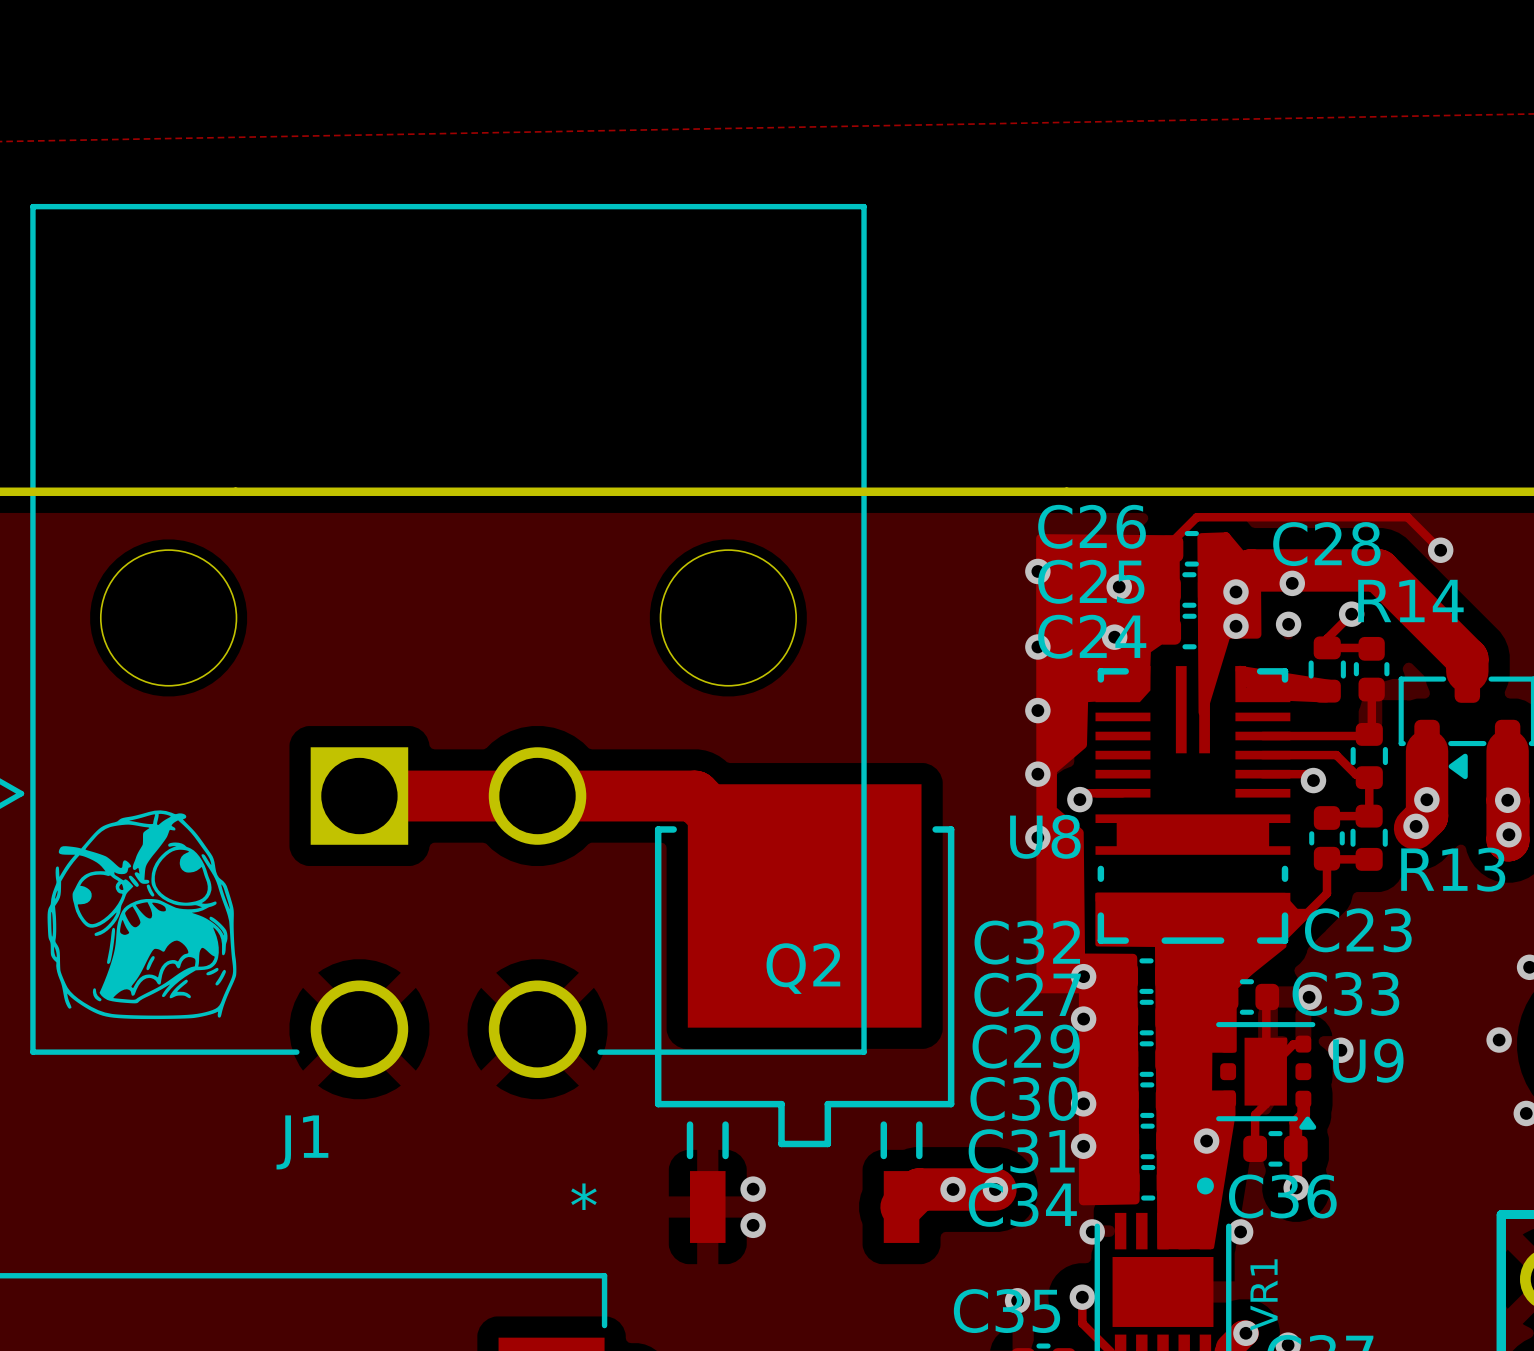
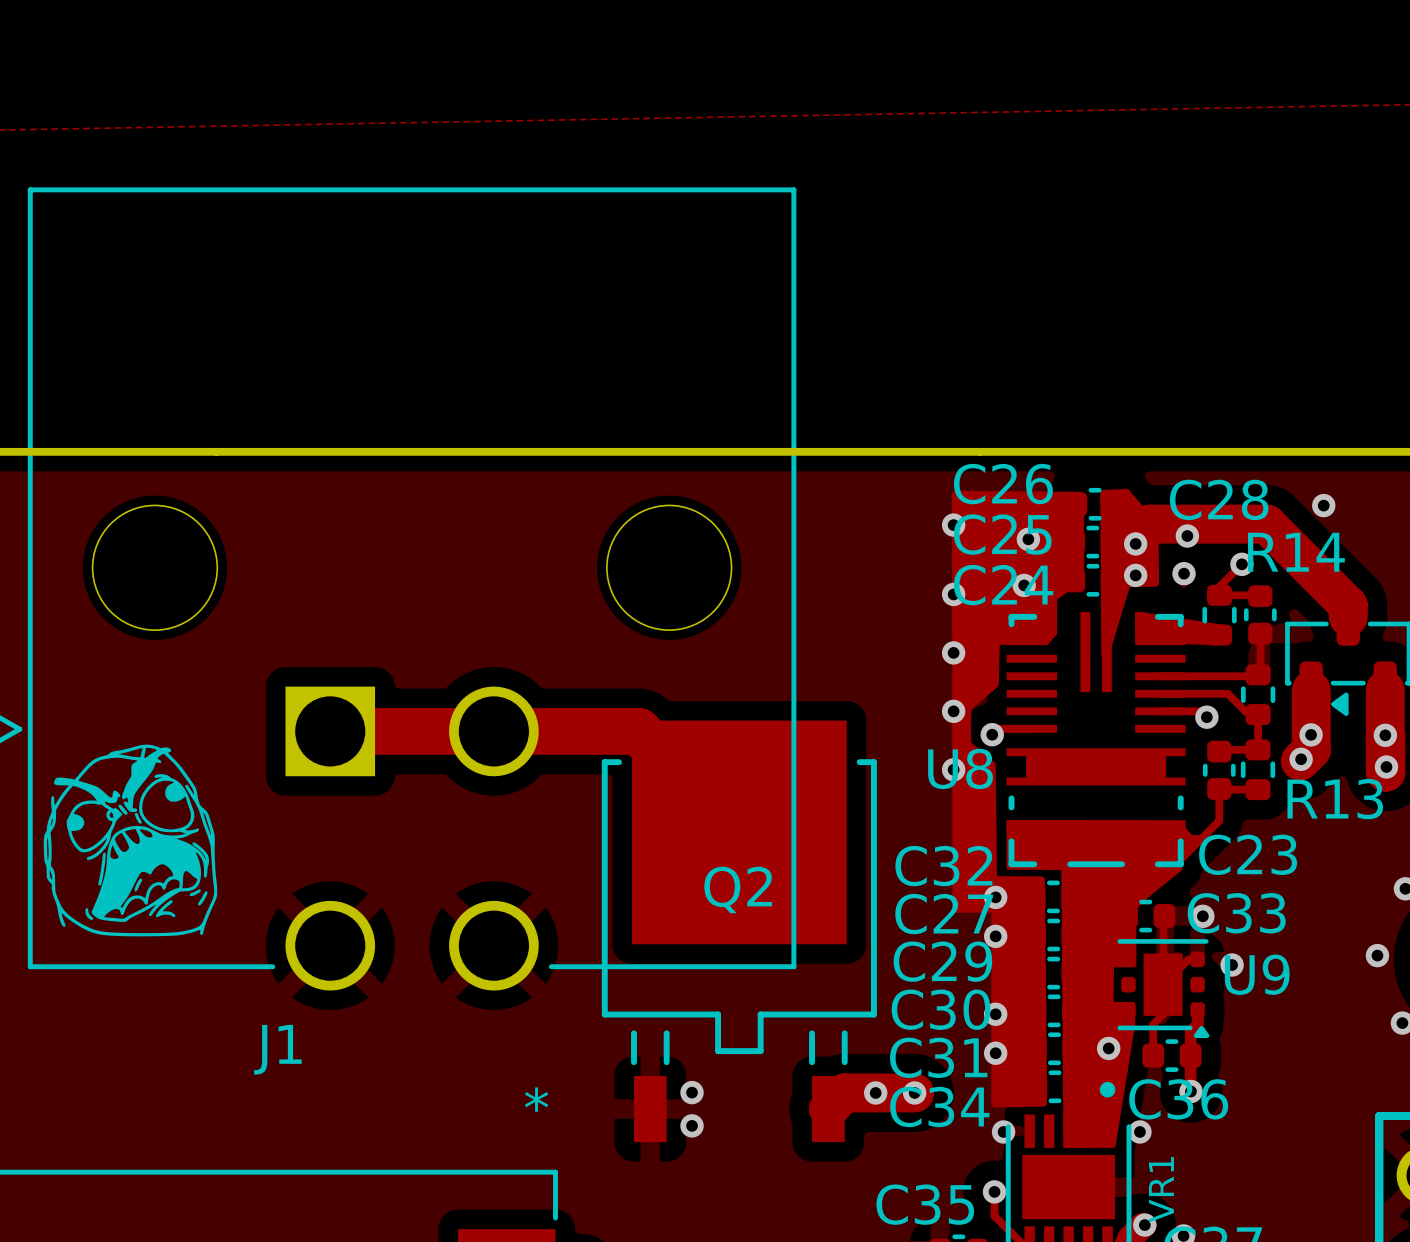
track: (1171, 548) (1171, 542) (1196, 517) (1407, 517) (1440, 550) -> none
via: (1017, 1300) -> none

